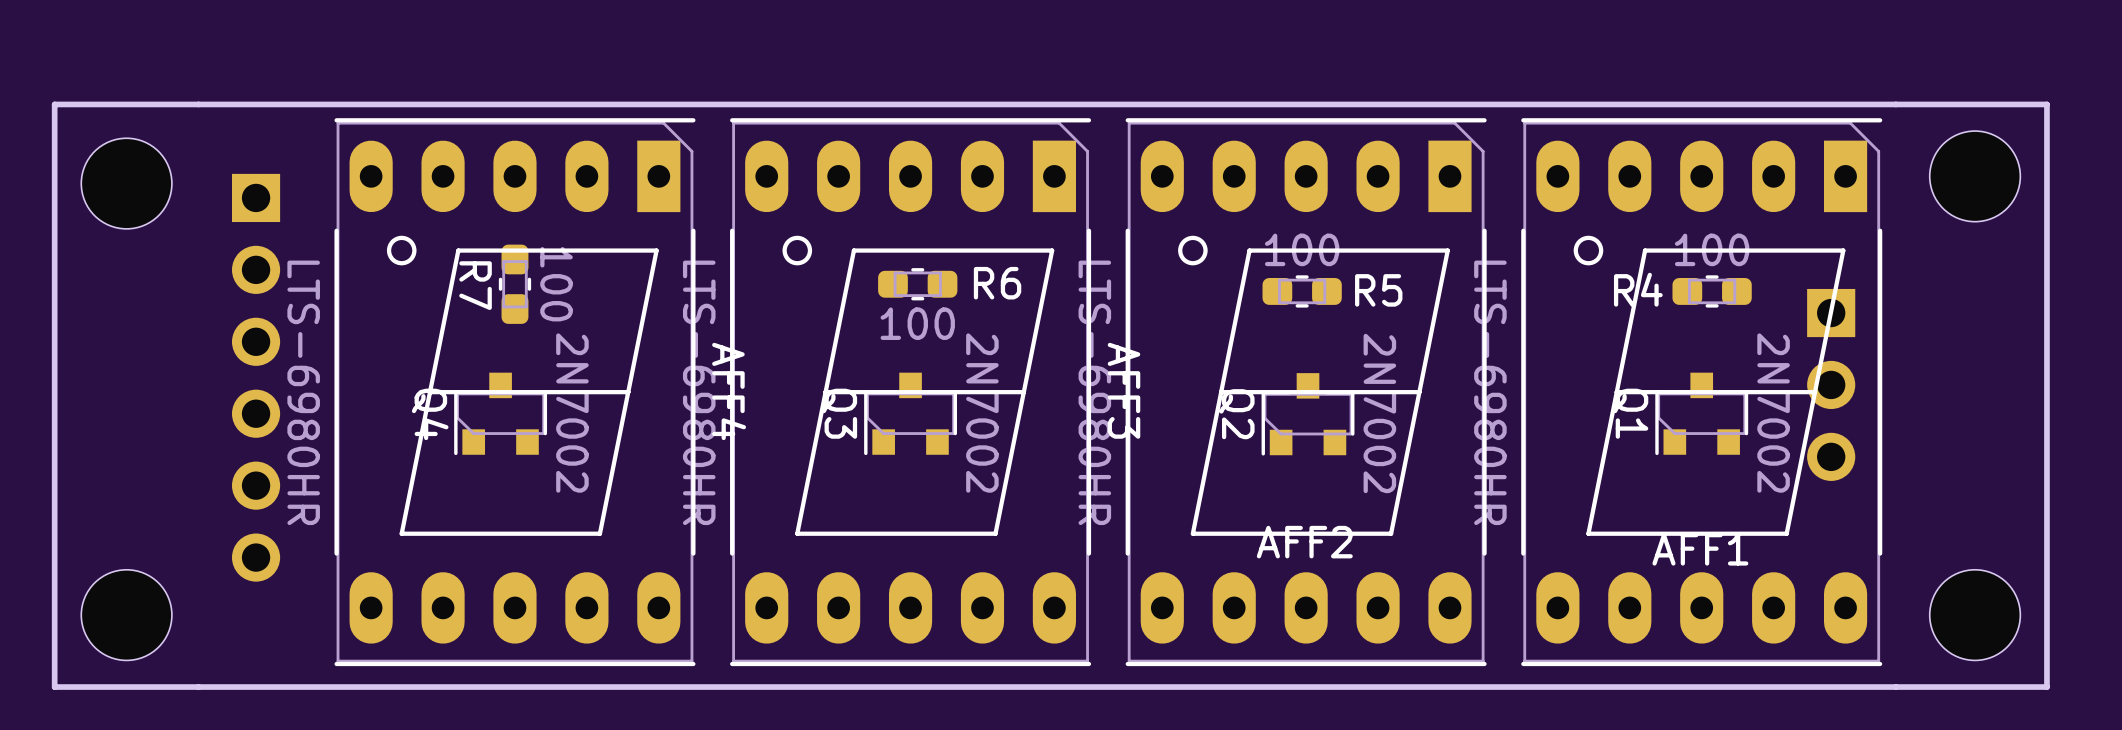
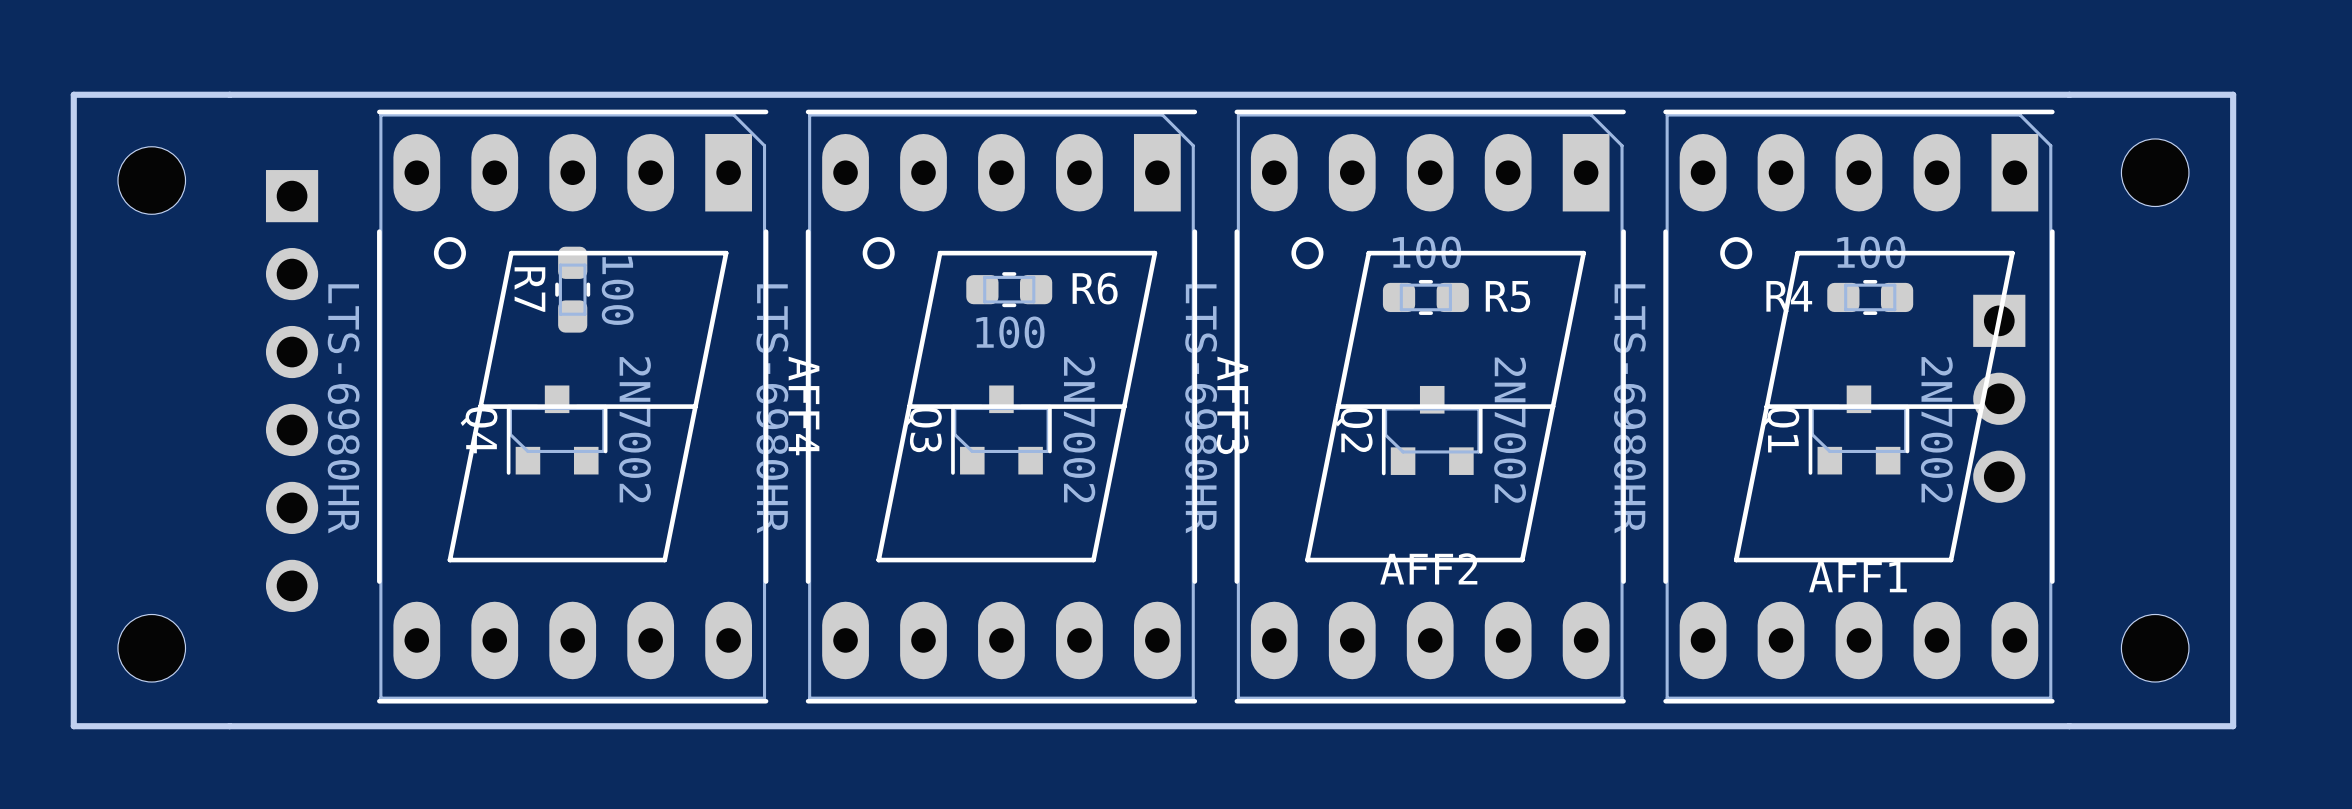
part footprint: [1929, 131, 2021, 222] -> [2121, 138, 2189, 207]
part footprint: [81, 138, 172, 229] -> [117, 146, 186, 215]
part footprint: [81, 569, 172, 661] -> [117, 614, 186, 683]
part footprint: [1929, 569, 2021, 661] -> [2121, 614, 2189, 683]

